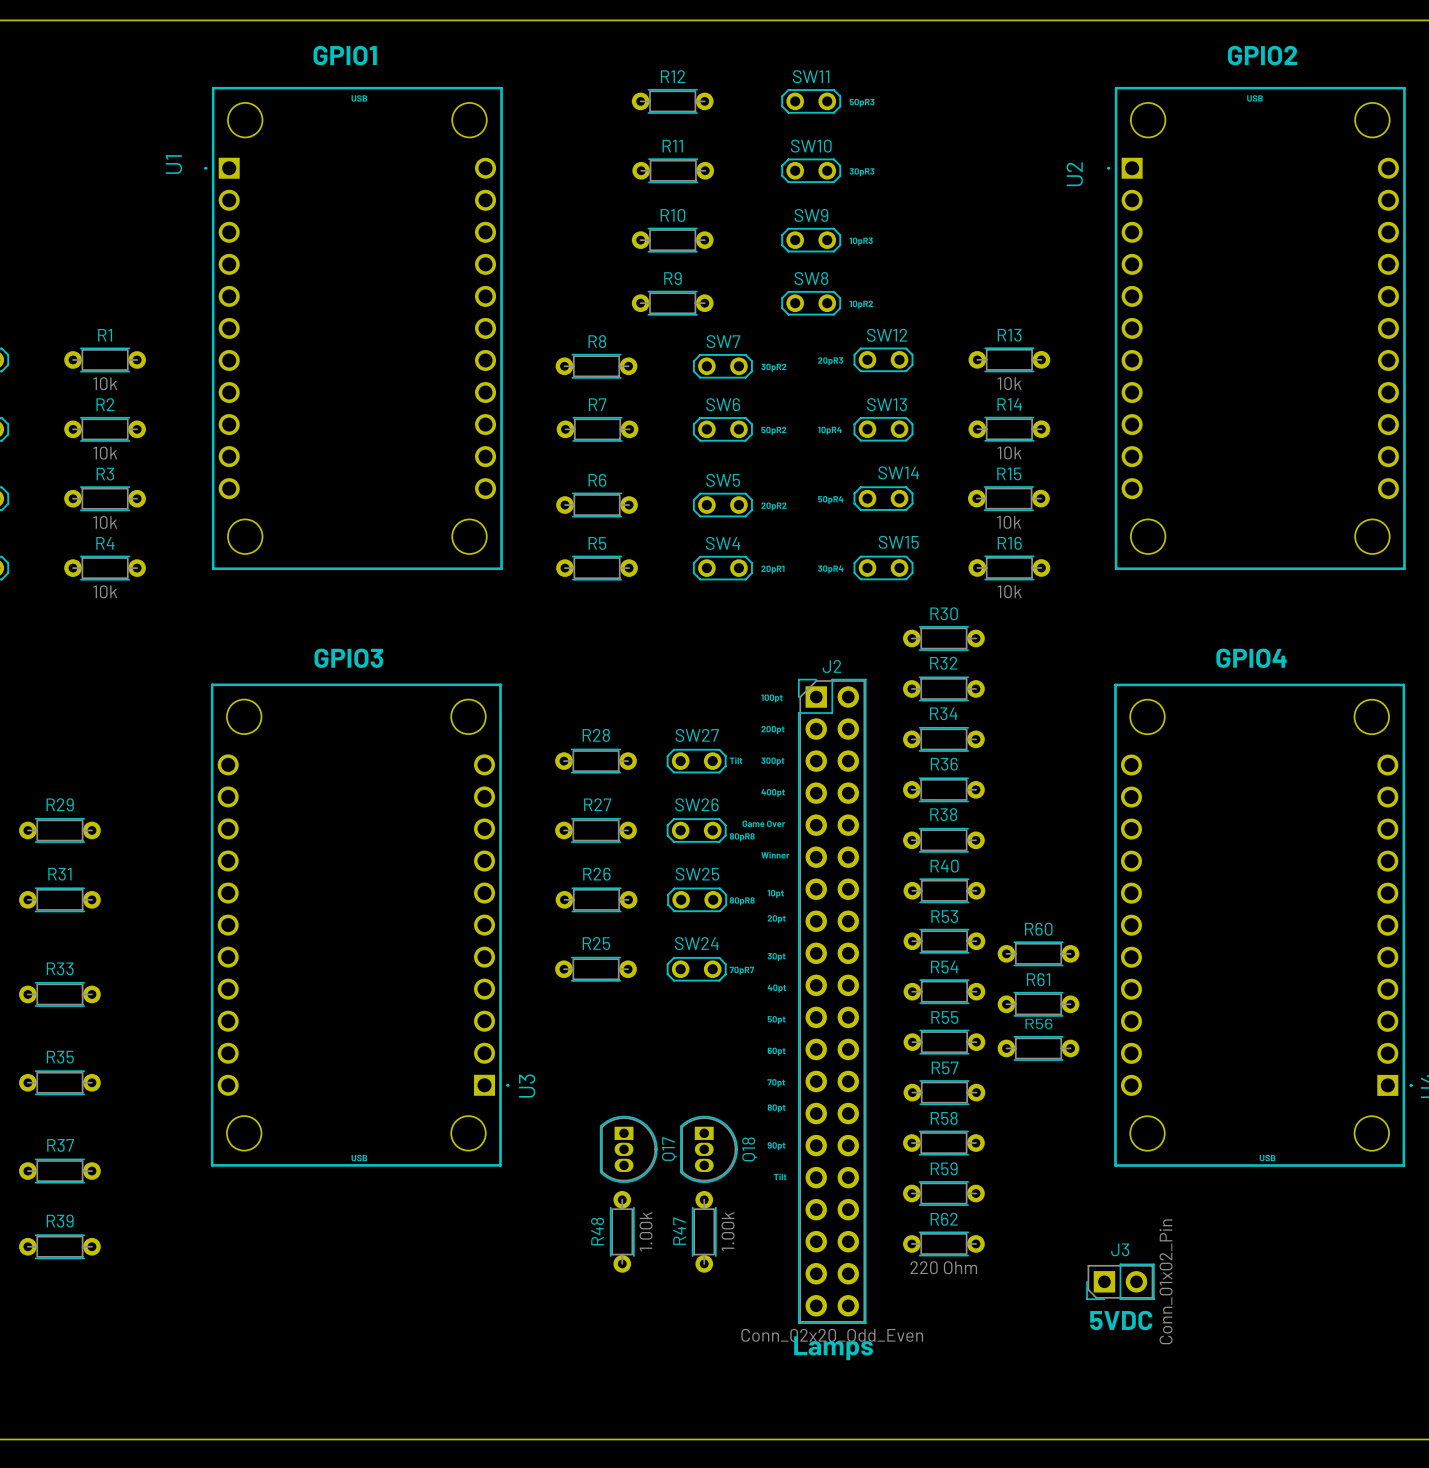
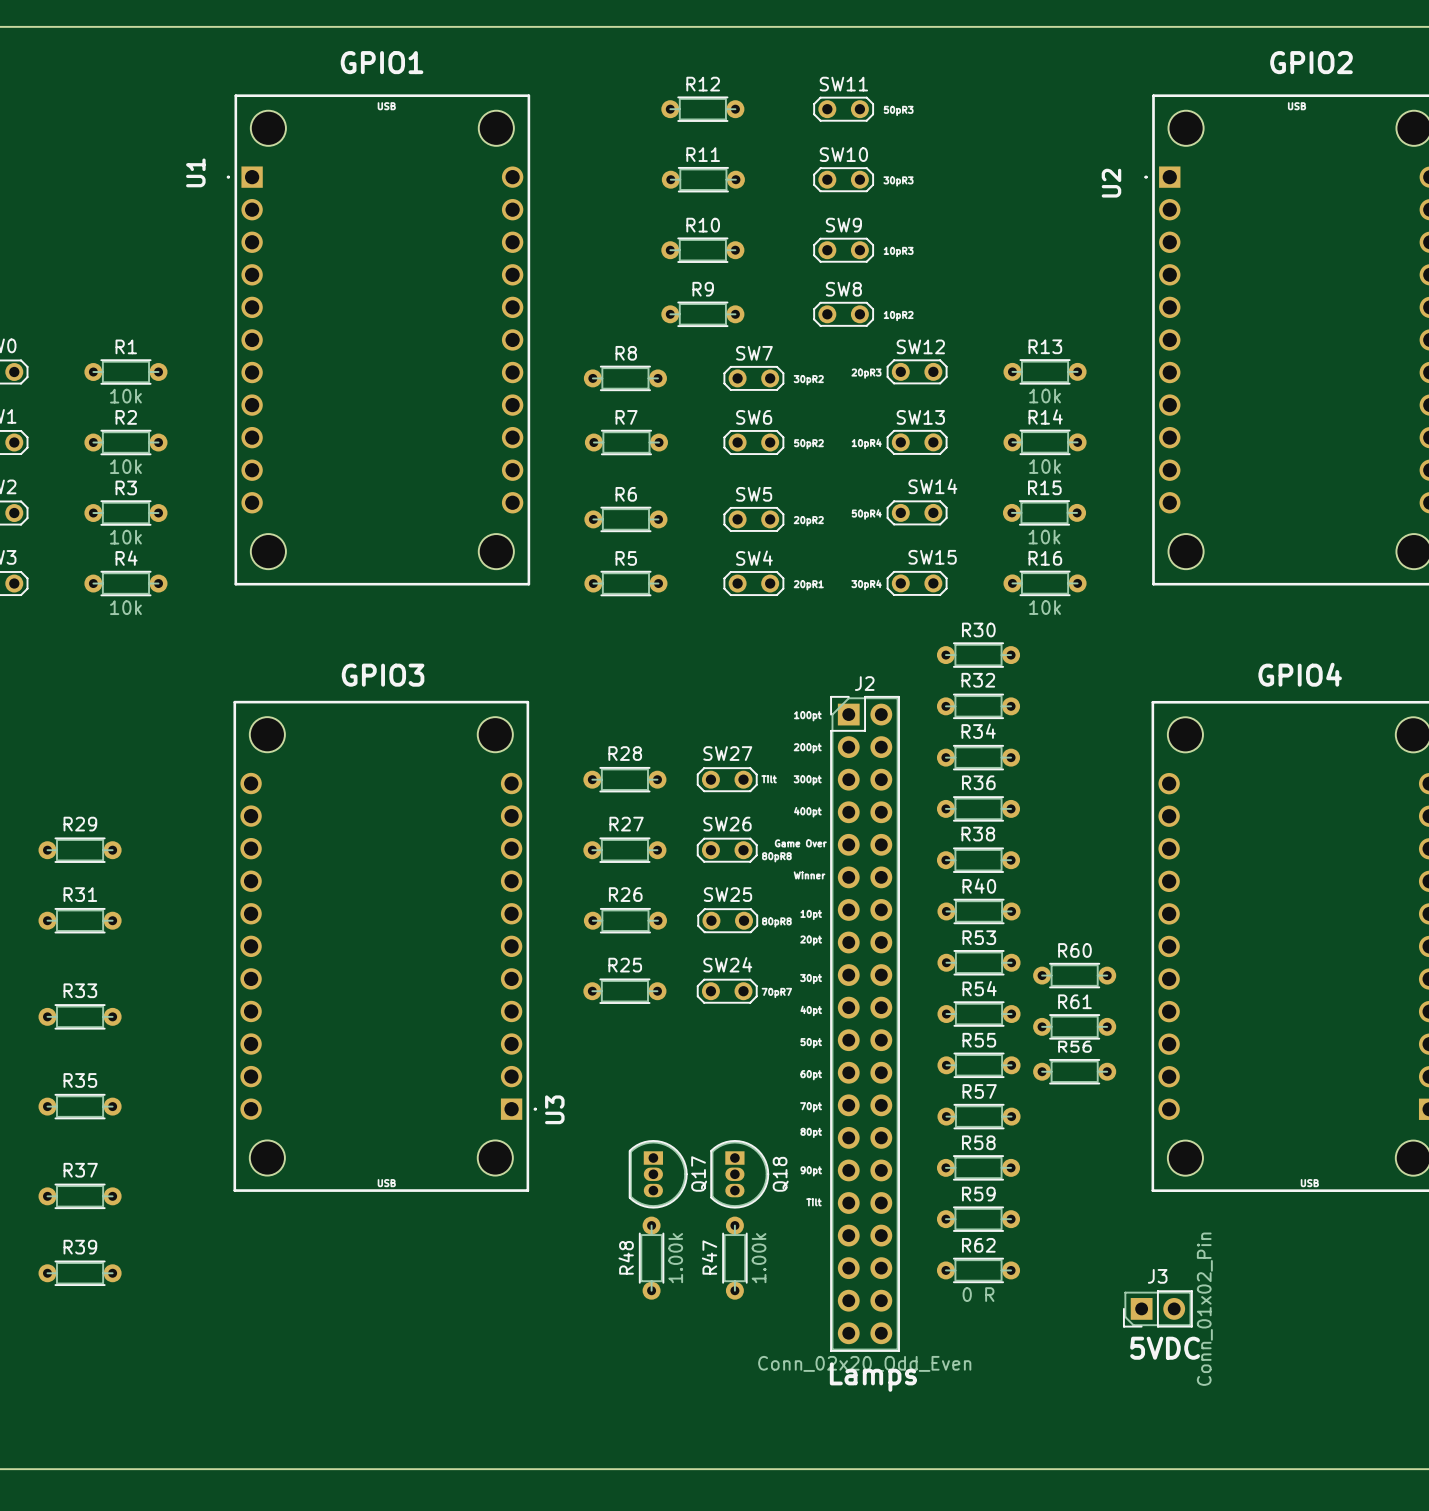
R62 value: 220 Ohm (943, 1267) -> 0 R (978, 1294)

